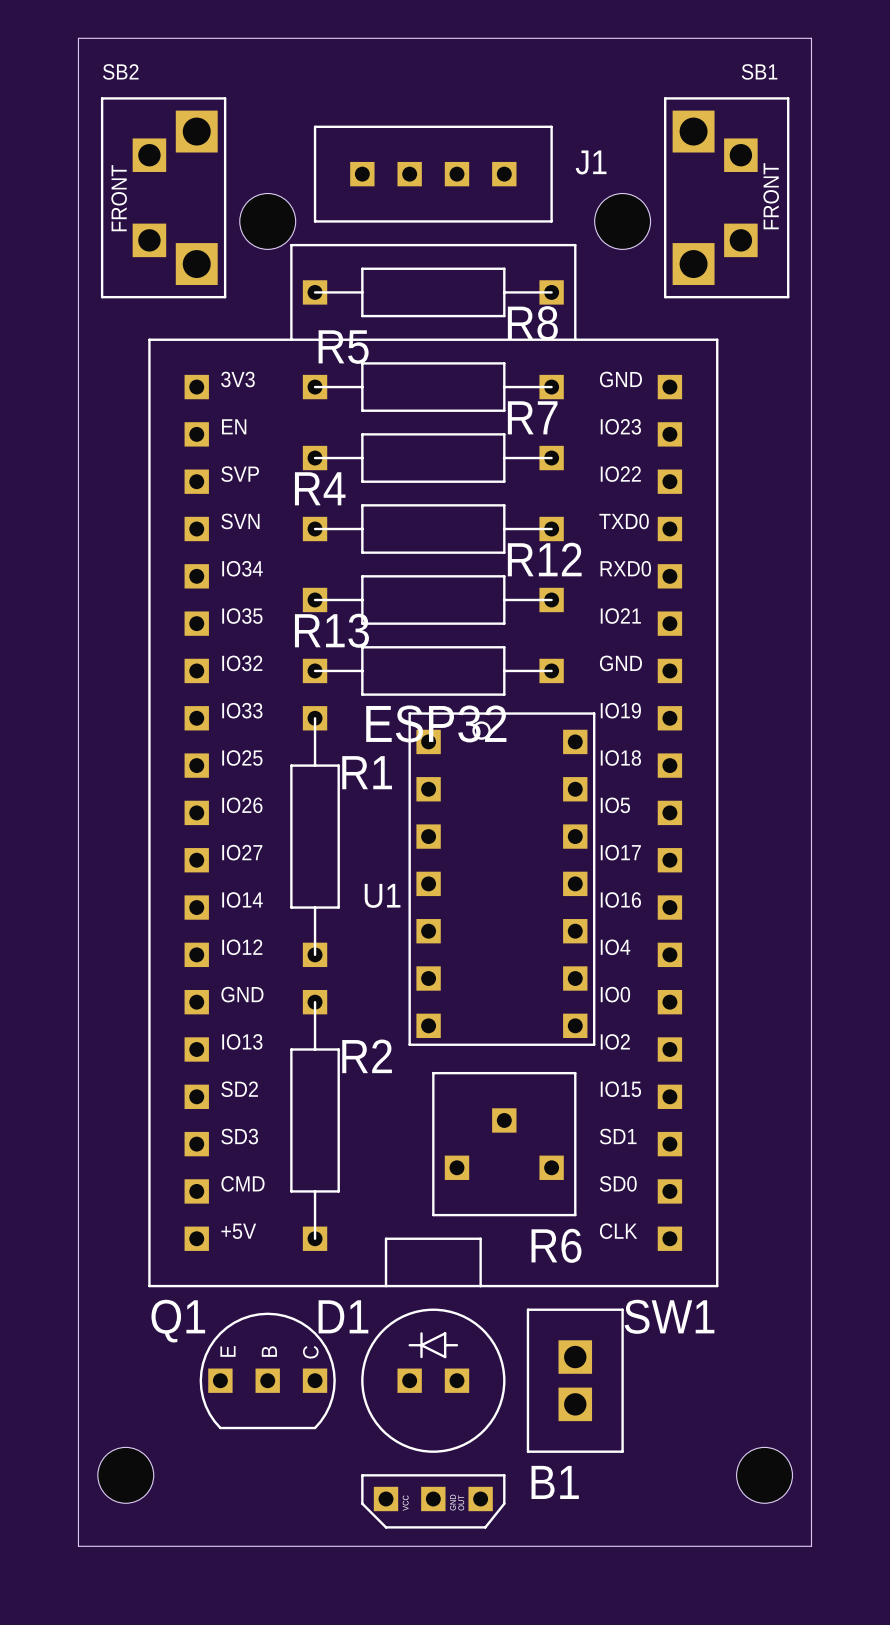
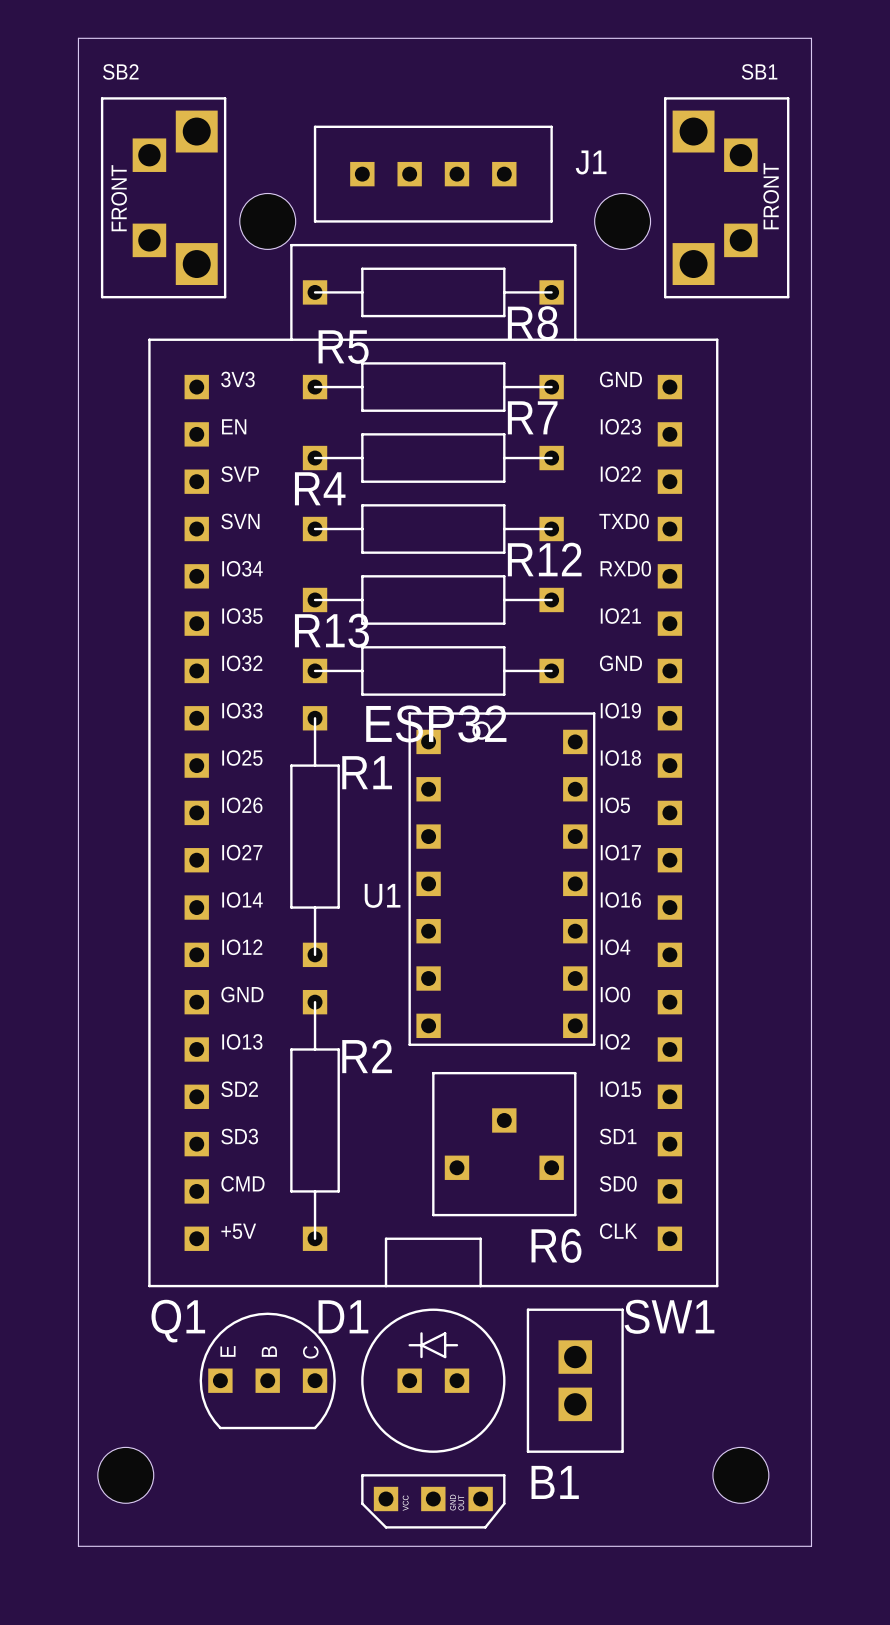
hole position: (764, 1475) -> (740, 1475)

